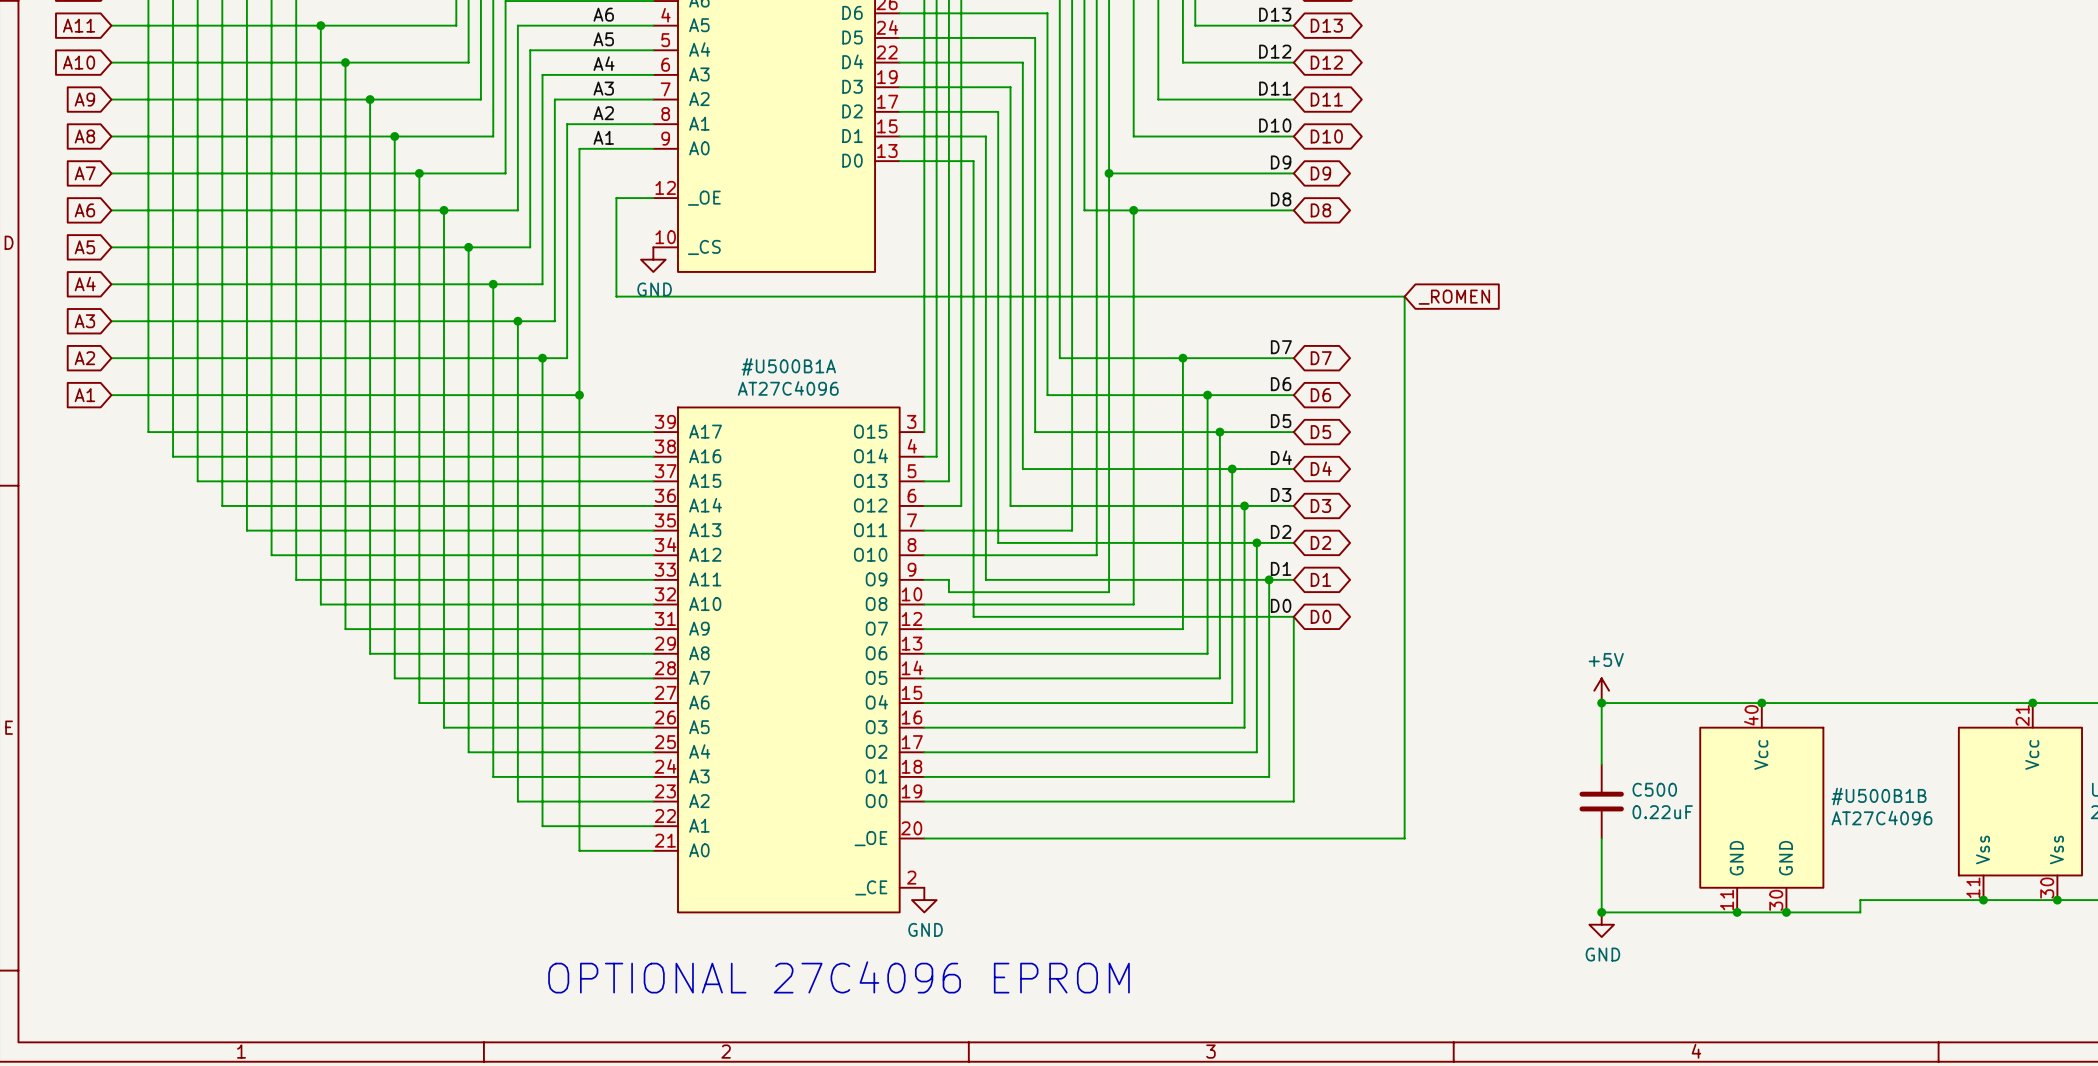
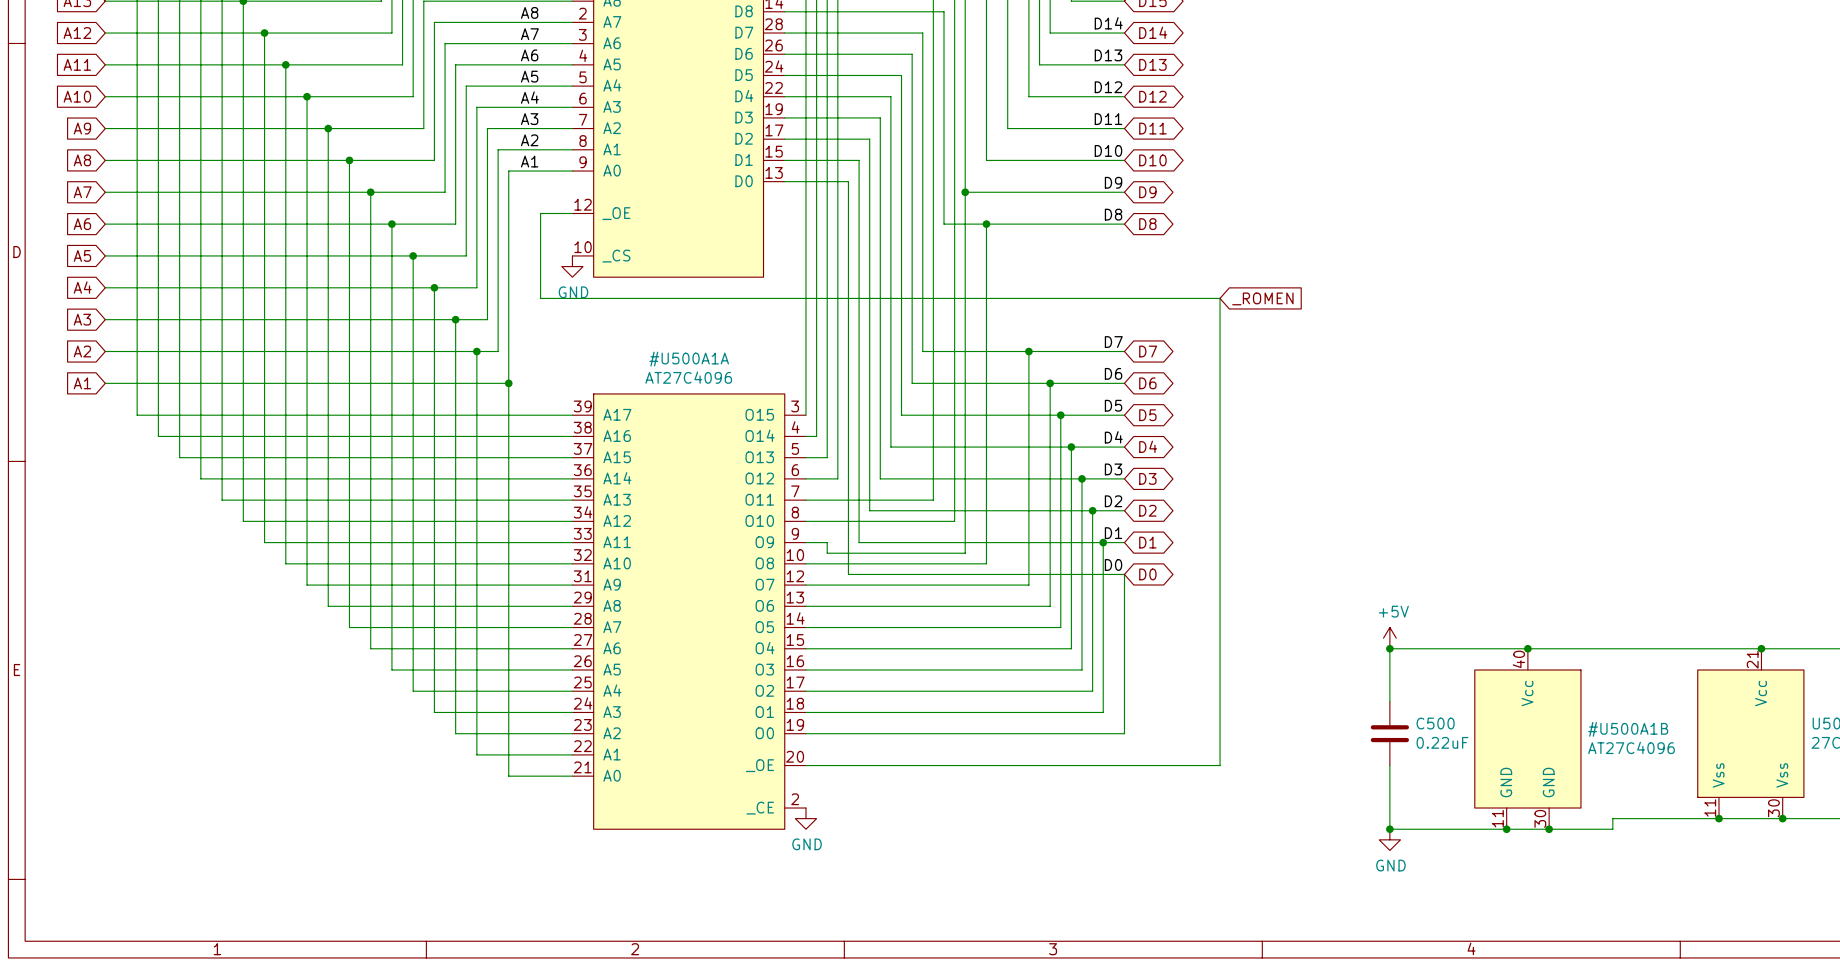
#U500B1A name: #U500B1A (788, 366) -> #U500A1A (689, 359)
#U500B1B name: #U500B1B (1879, 796) -> #U500A1B (1628, 729)
text: OPTIONAL 27C4096 EPROM (838, 977) -> none

